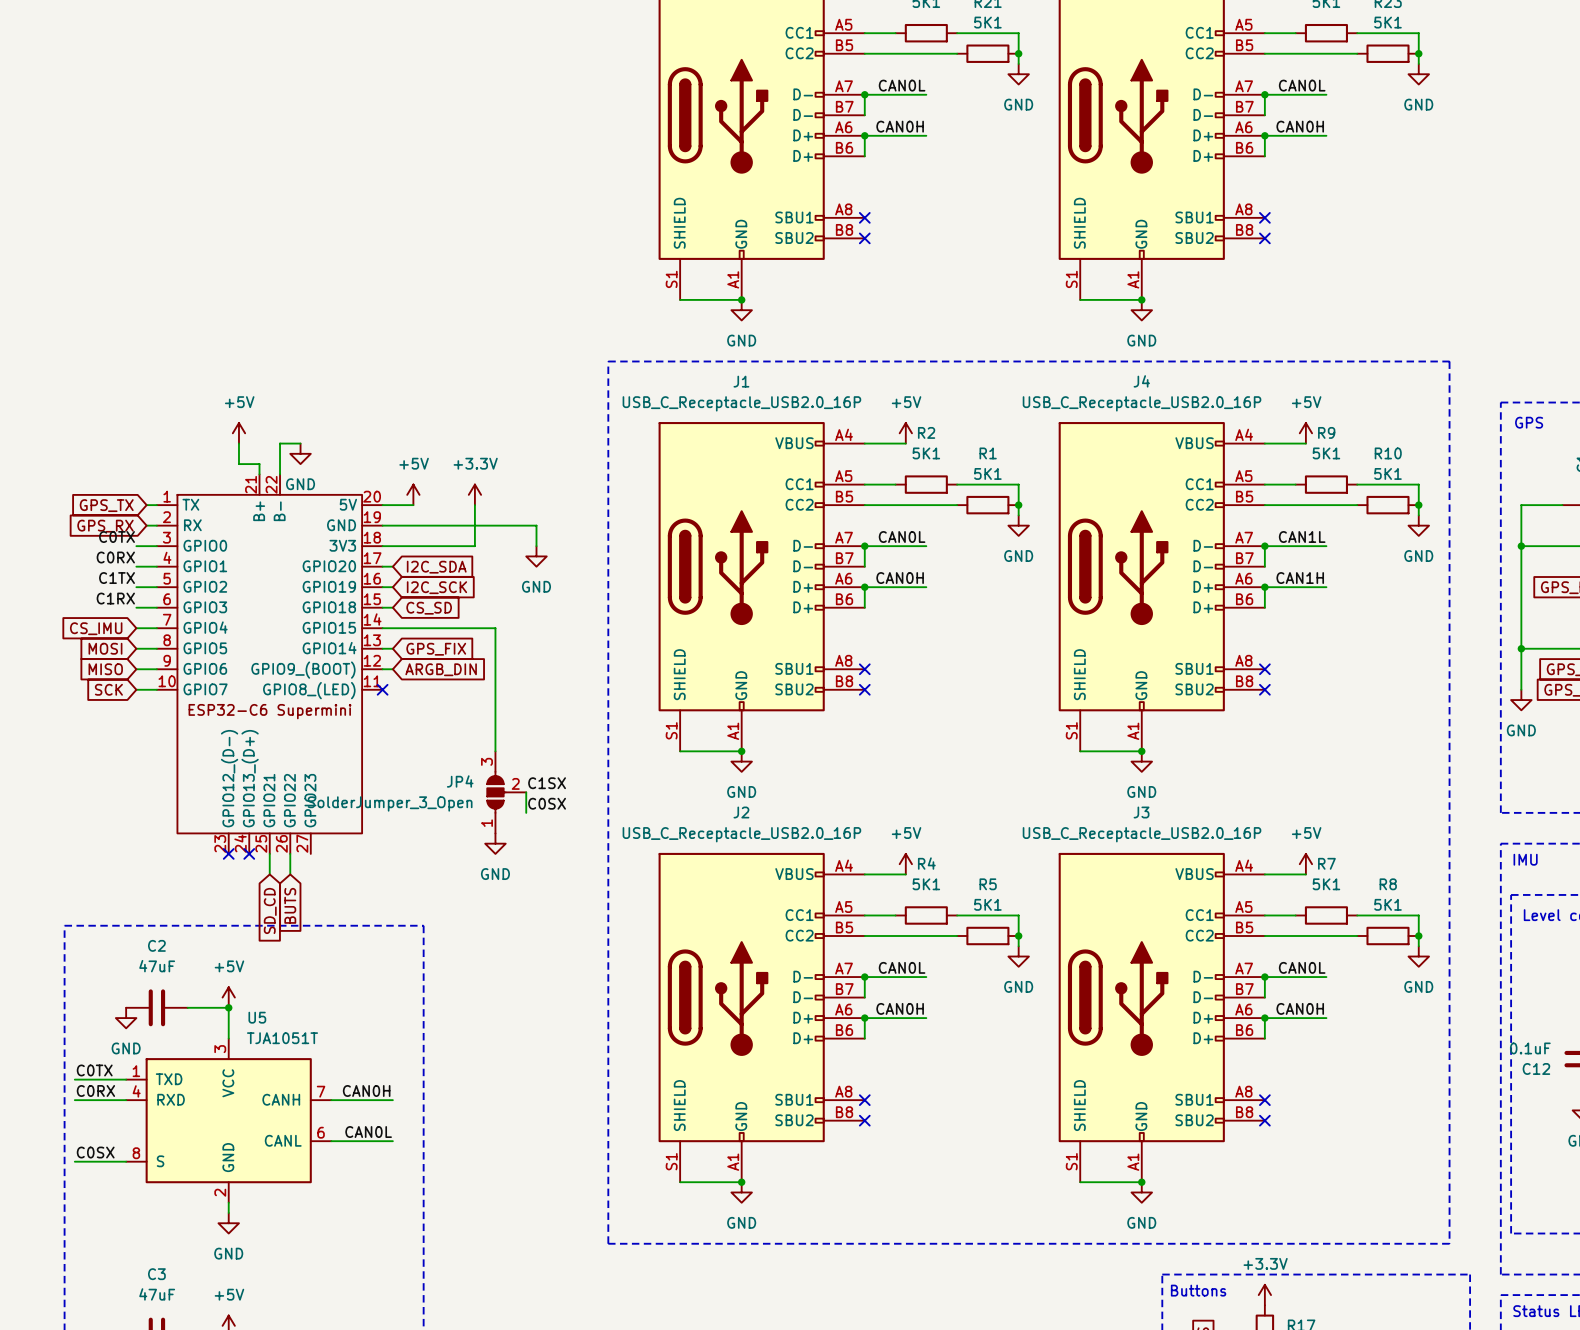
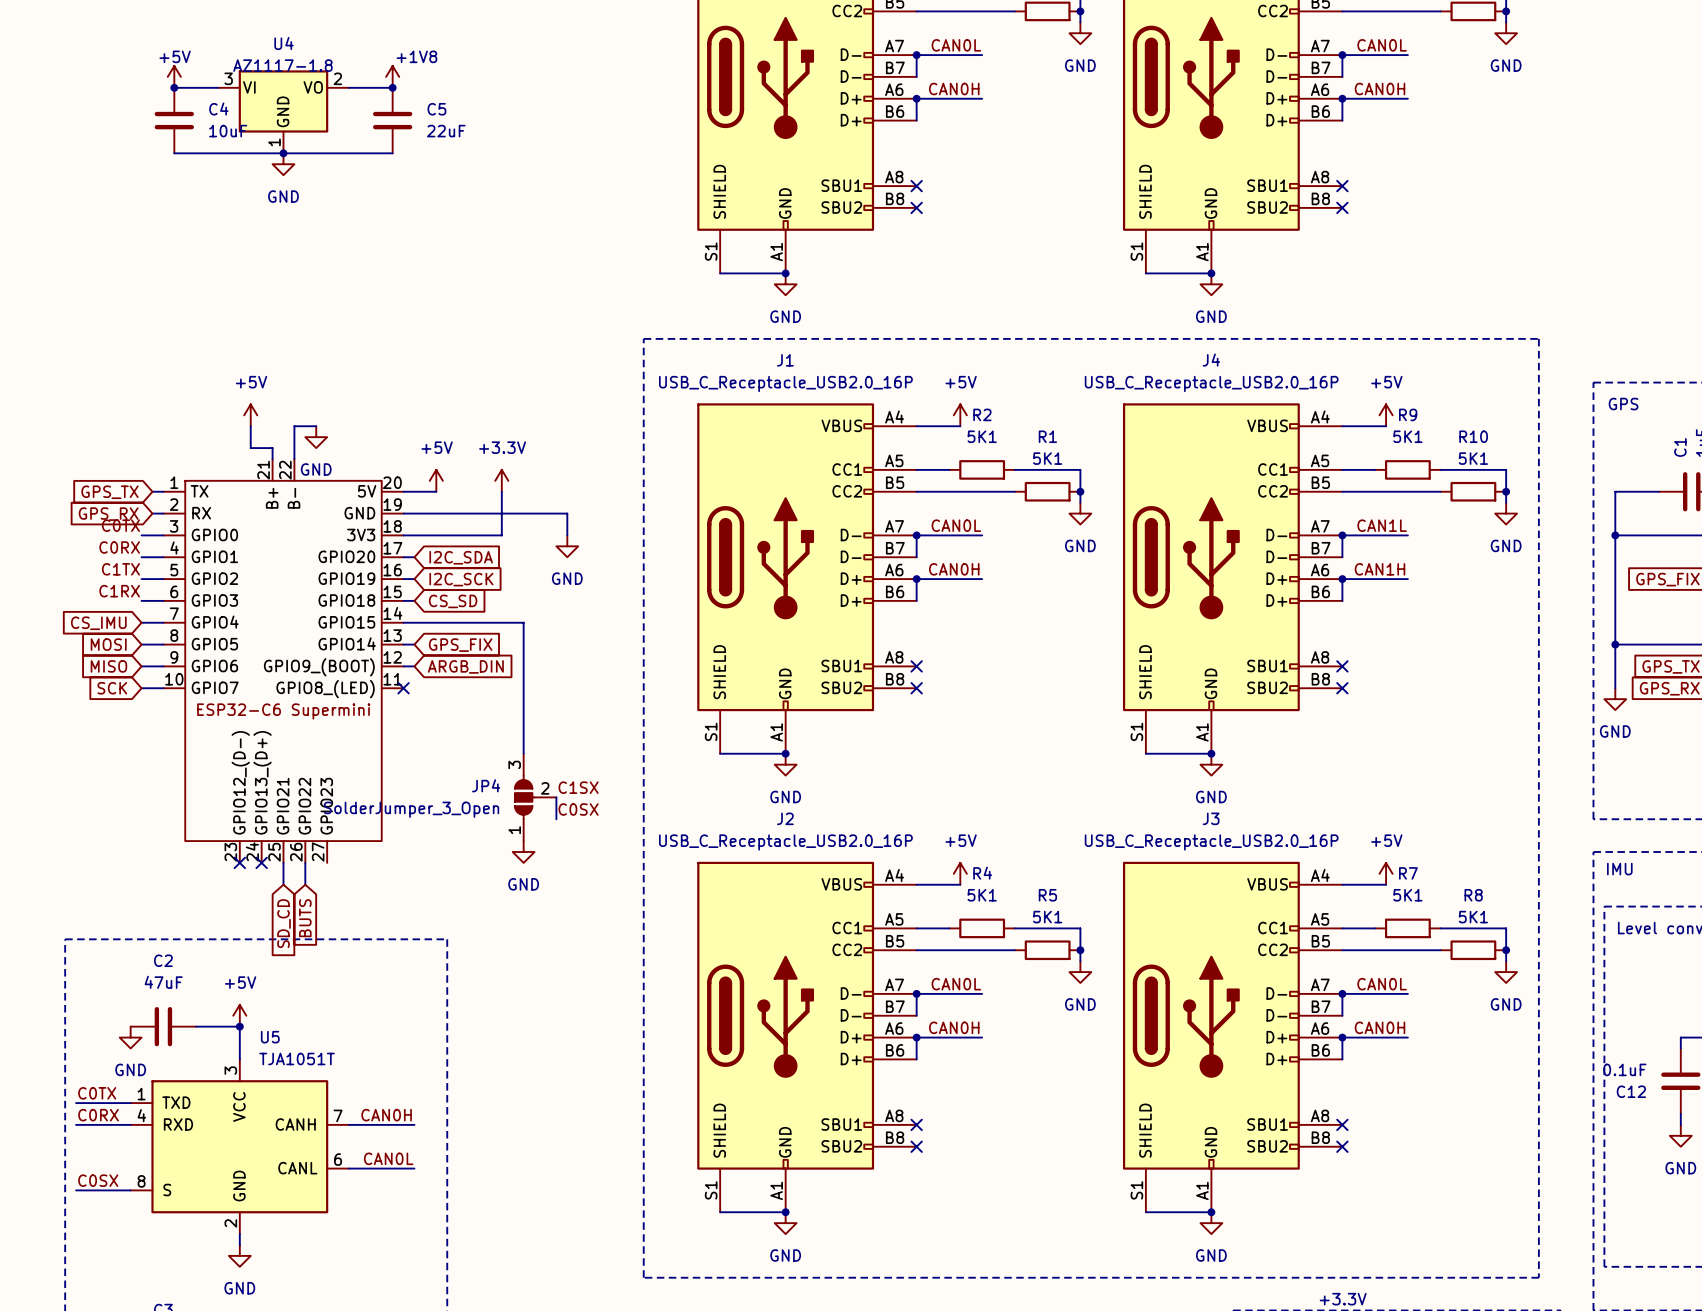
power symbol: none -> +5V (174, 76)
power symbol: none -> +1V8 (392, 76)
wire: none -> (174, 87) (217, 87)
junction: none -> (174, 87)
wire: none -> (348, 87) (392, 87)
junction: none -> (392, 87)
U4: none -> AZ1117-1.8 (283, 111)
C4: none -> 10uF (174, 120)
C5: none -> 22uF (392, 120)
wire: none -> (174, 153) (392, 153)
junction: none -> (283, 153)
power symbol: none -> GND (283, 164)

